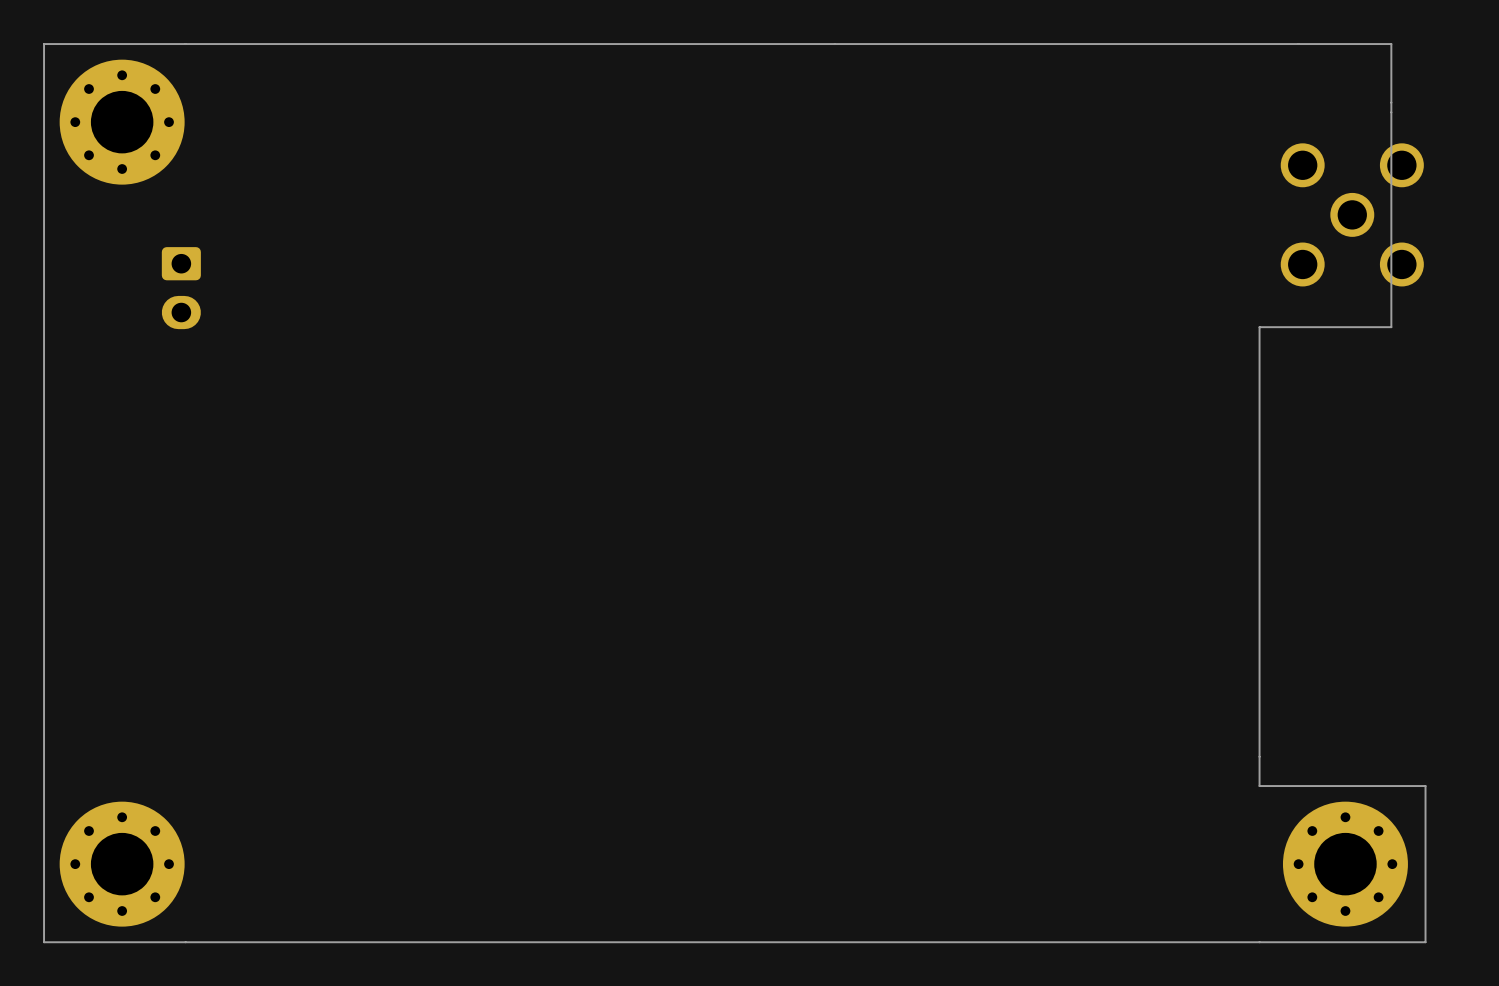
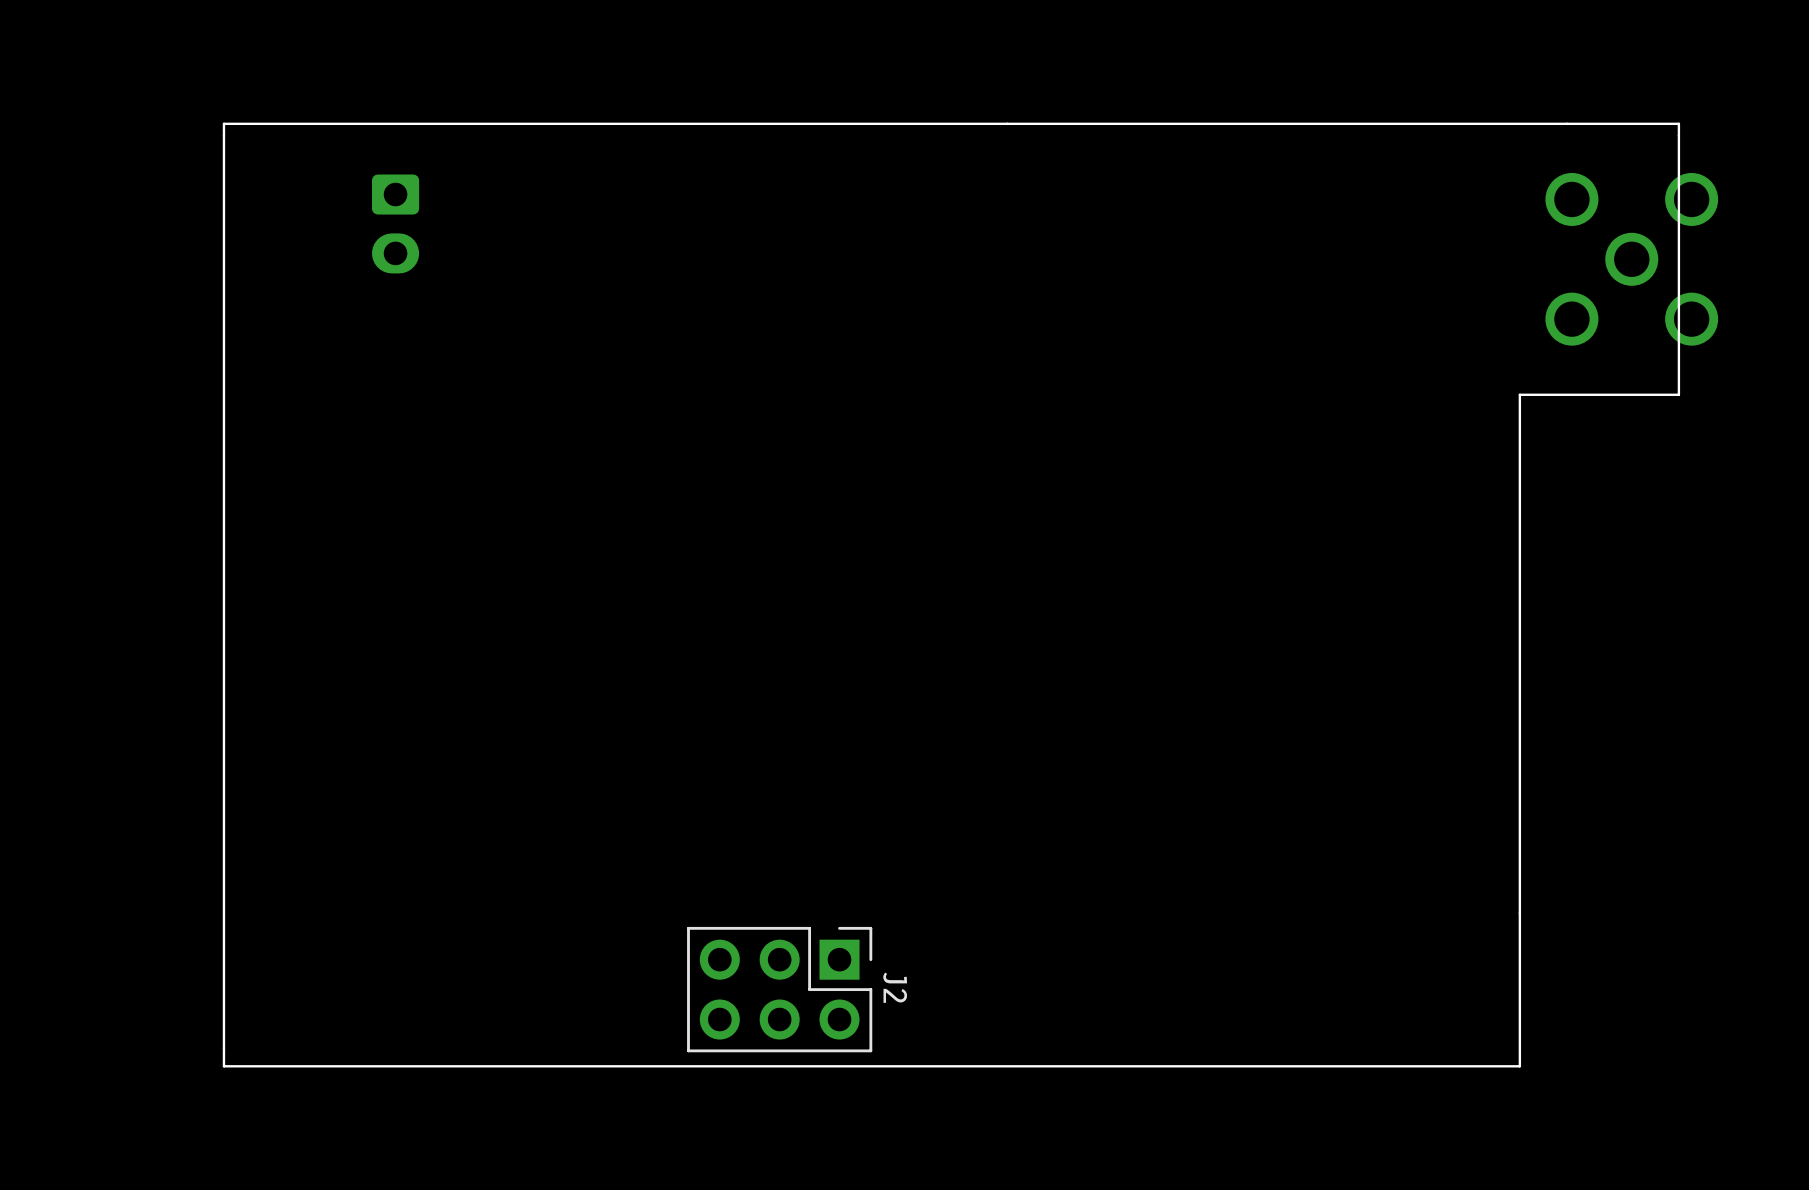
board edge: (1391, 102) (1391, 44) (44, 44) (44, 942) (1425, 942) (1425, 786) (1259, 786) -> (1678, 123) (223, 123) (223, 1066) (1519, 1066) (1519, 948)
part: (122, 122) -> none
part position: (181, 288) -> (395, 223)
J2: none -> (779, 989)
part: (122, 864) -> none
part: (1345, 864) -> none

